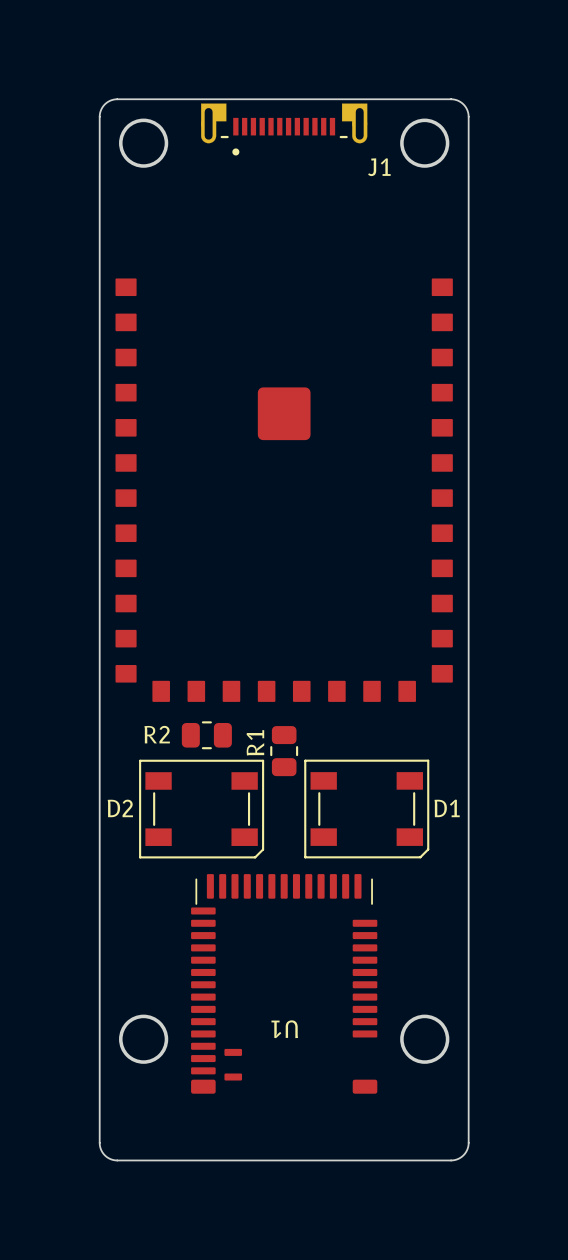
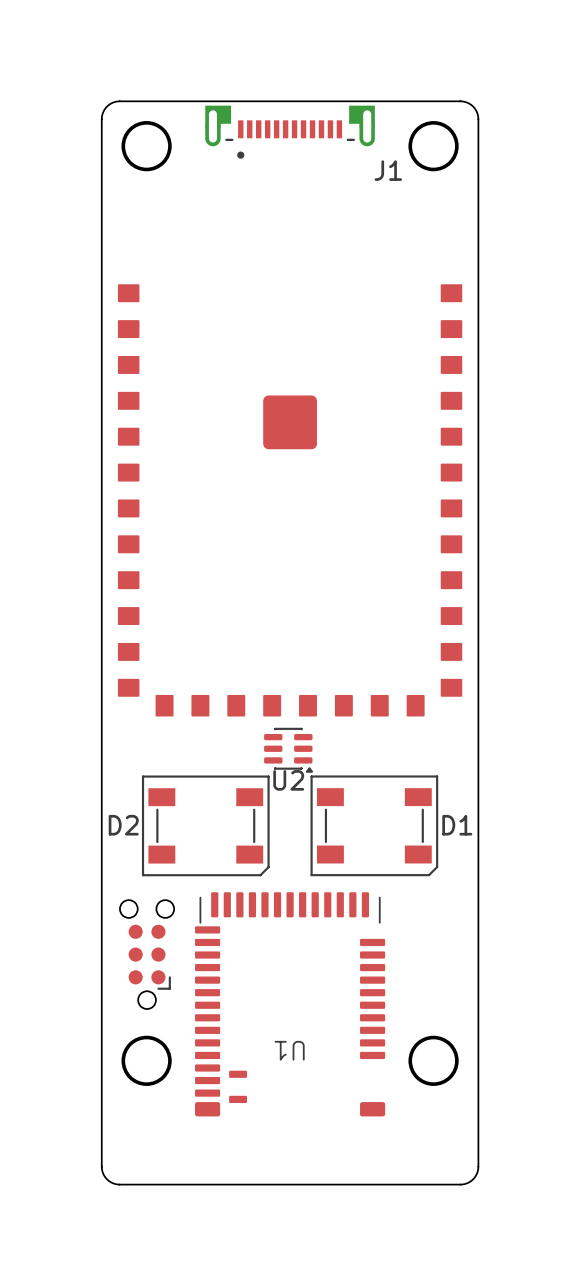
R2: (206, 735) -> none
U2: none -> (288, 750)
R1: (284, 751) -> none
part: none -> (147, 954)

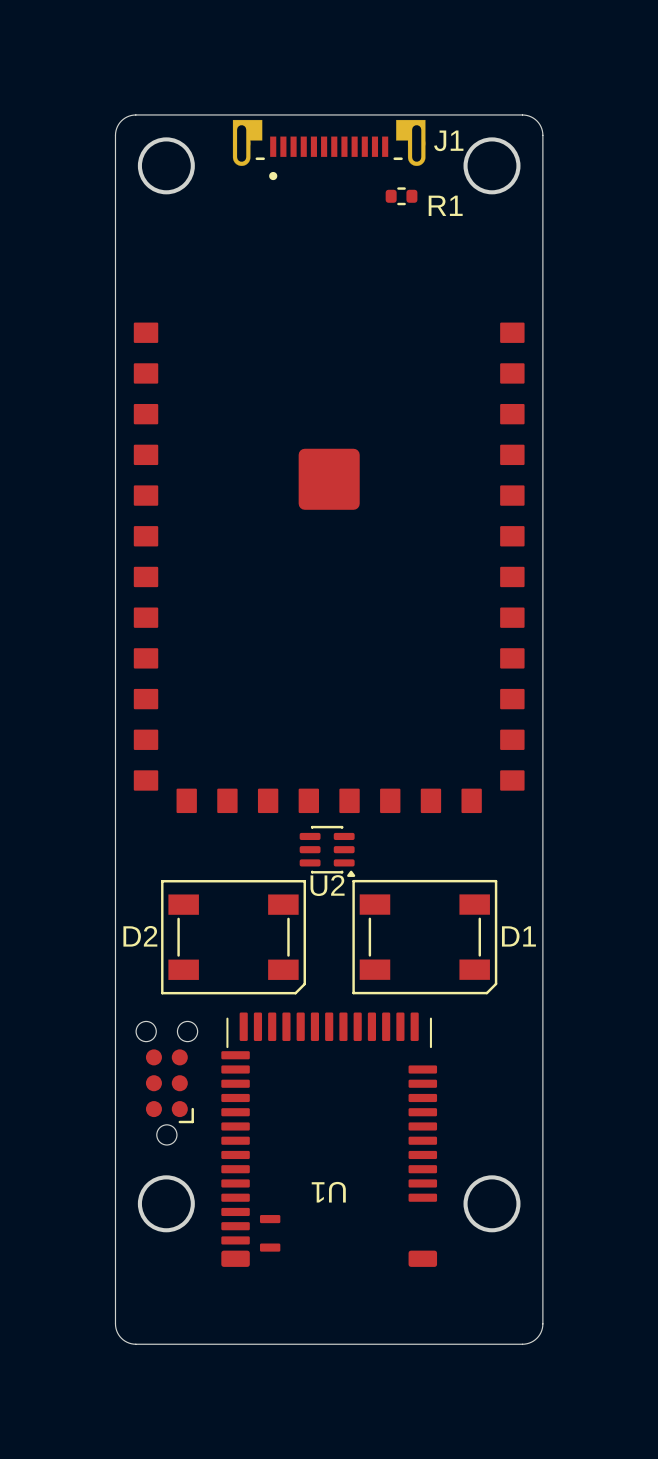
J1 name position: J1 (388, 170) -> J1 (448, 140)
R1: none -> (401, 196)

